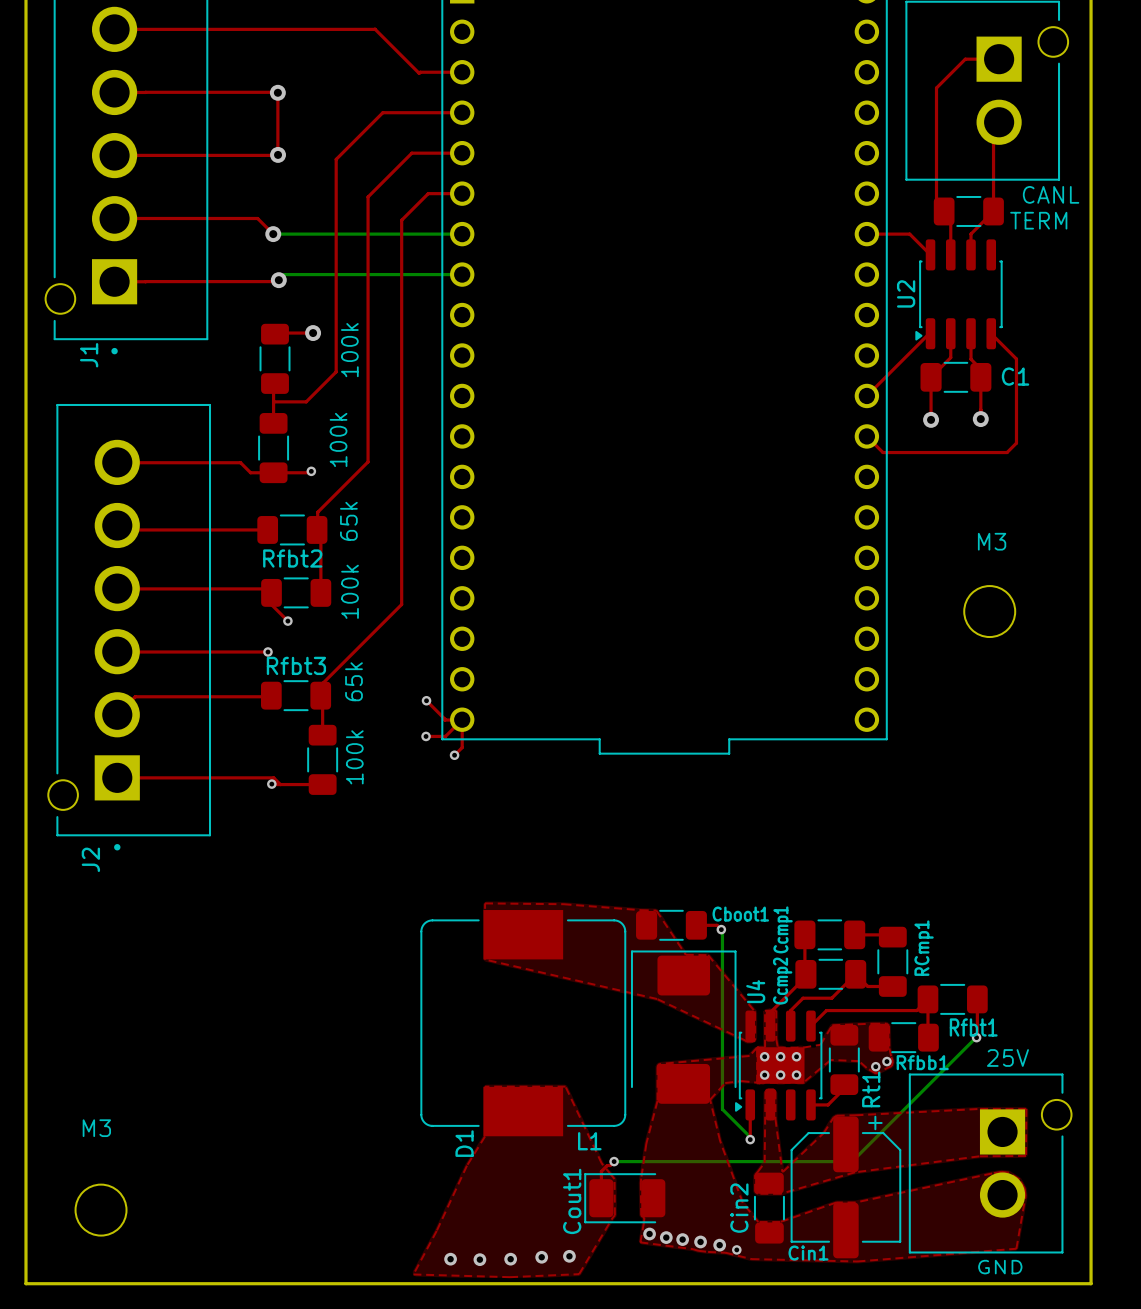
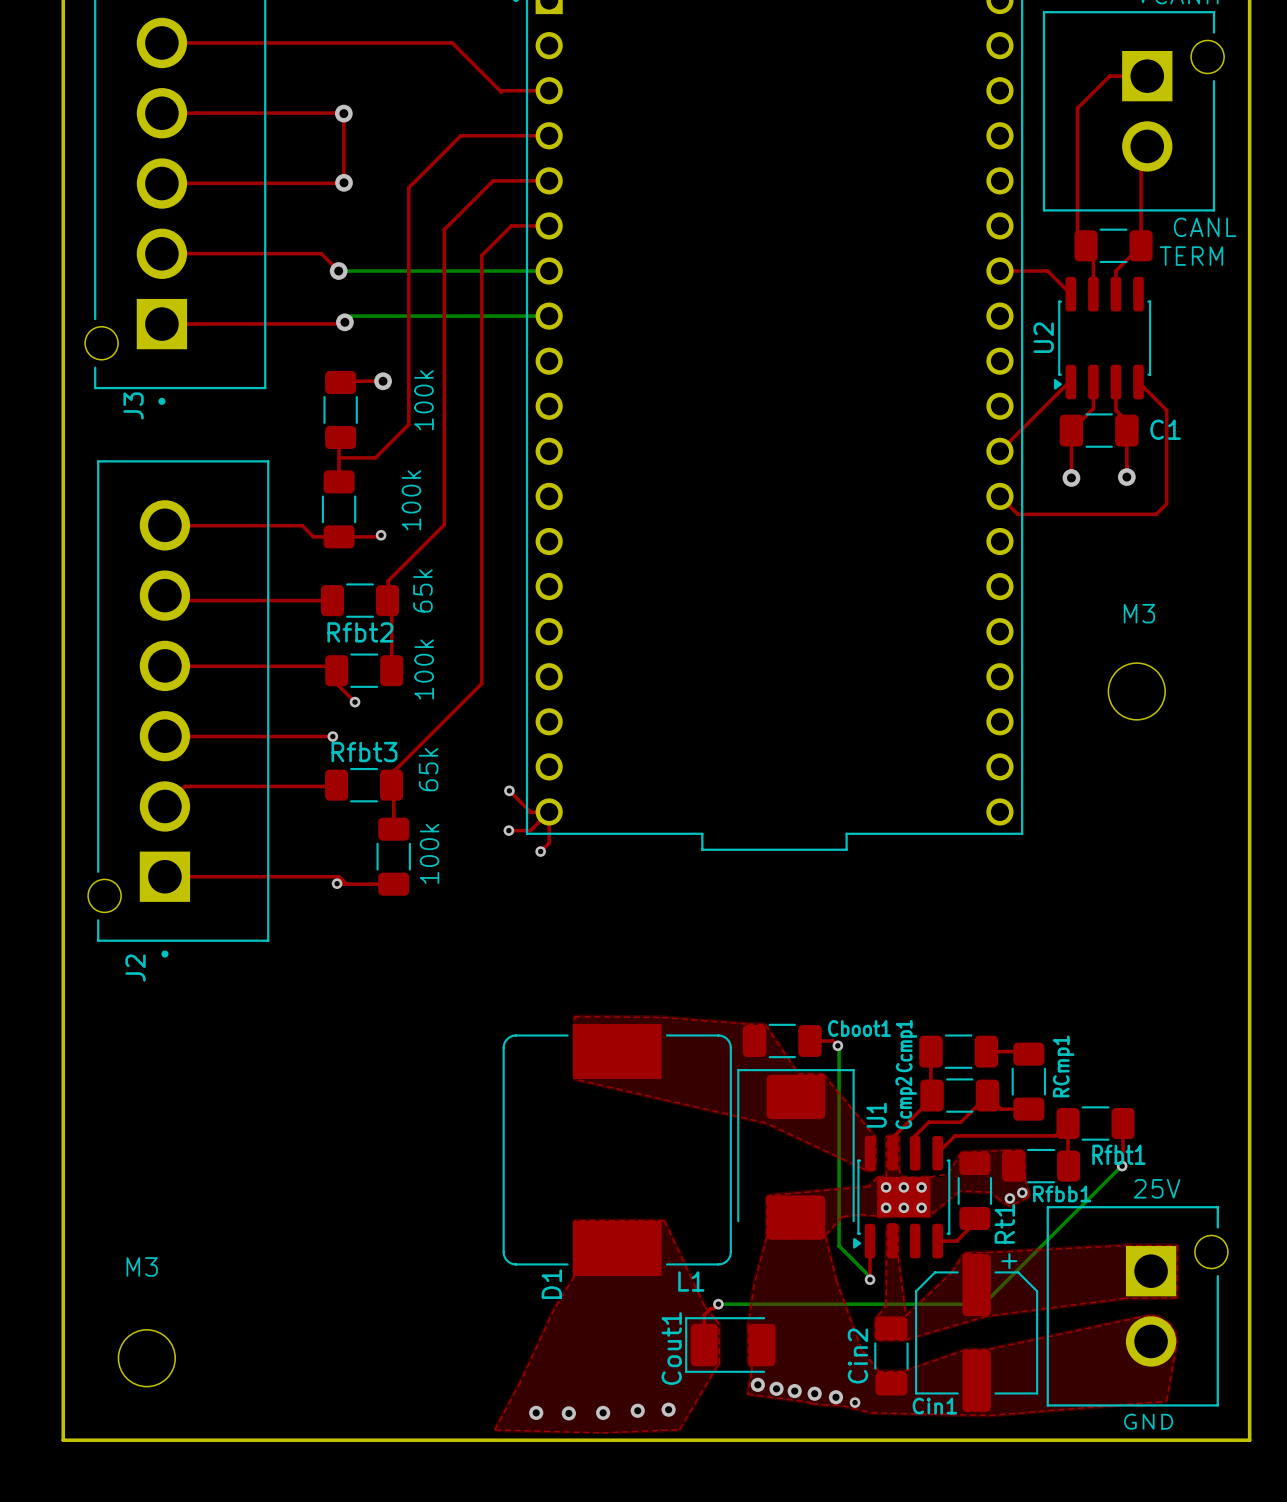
J1 name: J1 (89, 355) -> J3 (133, 405)
U4 name: U4 (755, 991) -> U1 (876, 1115)

